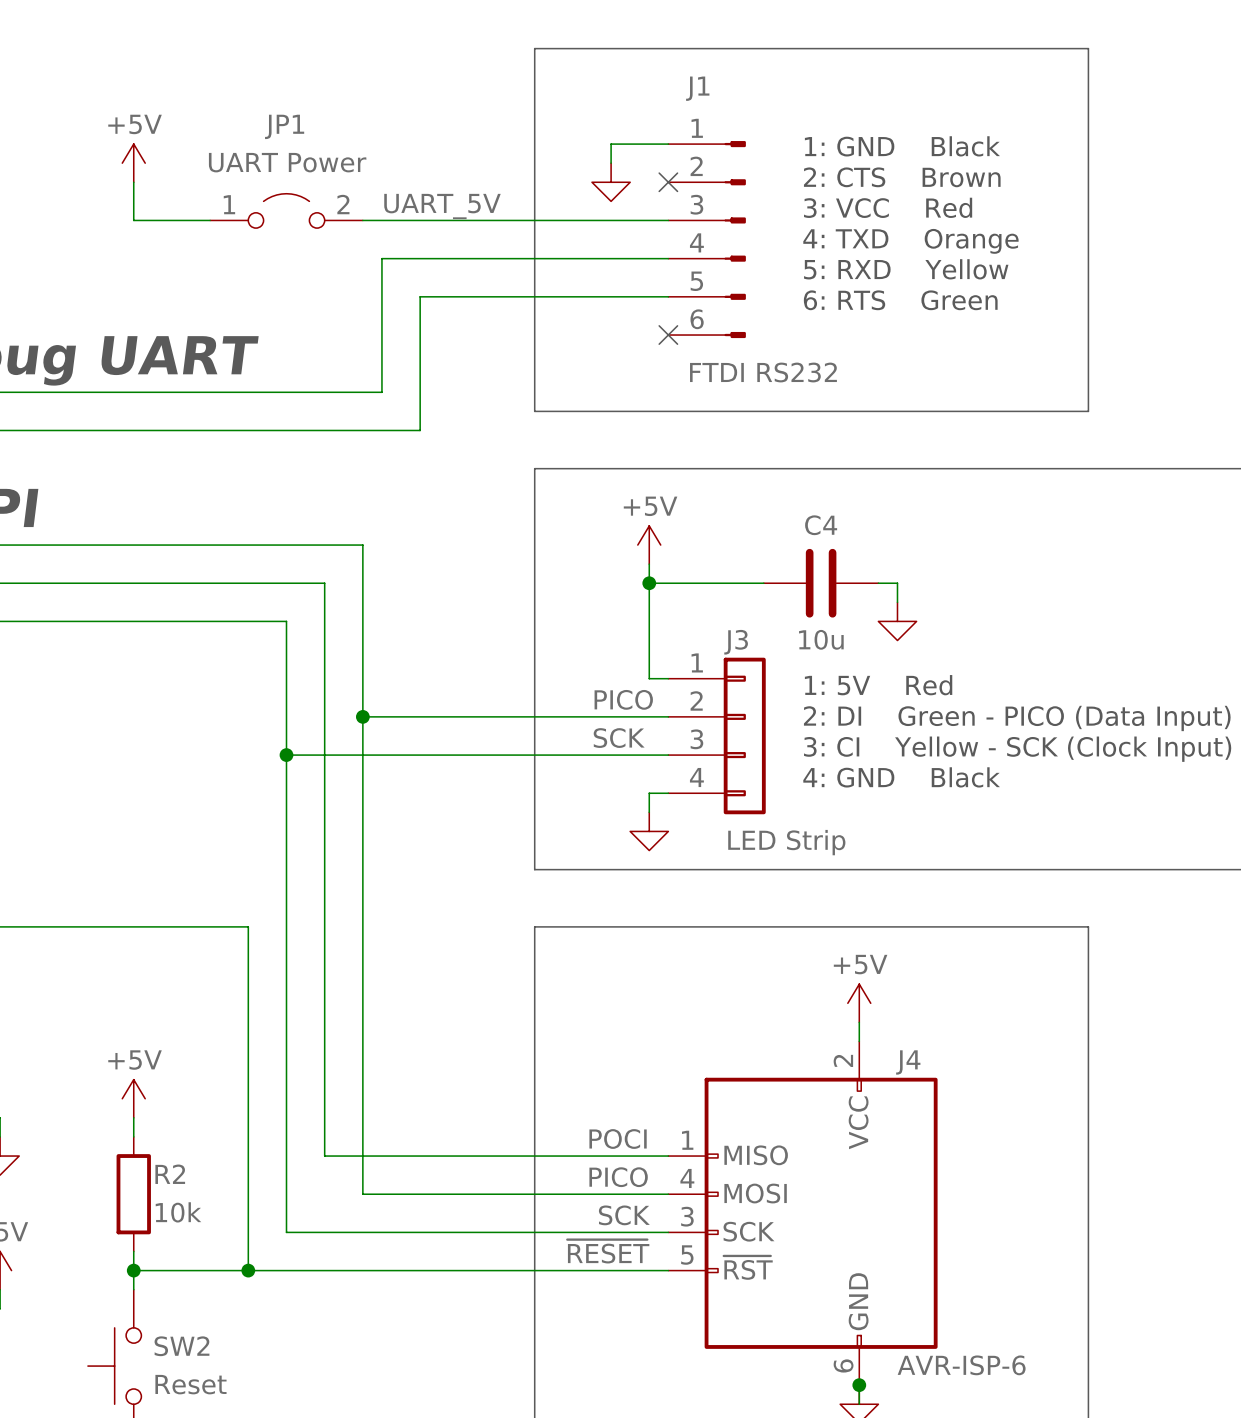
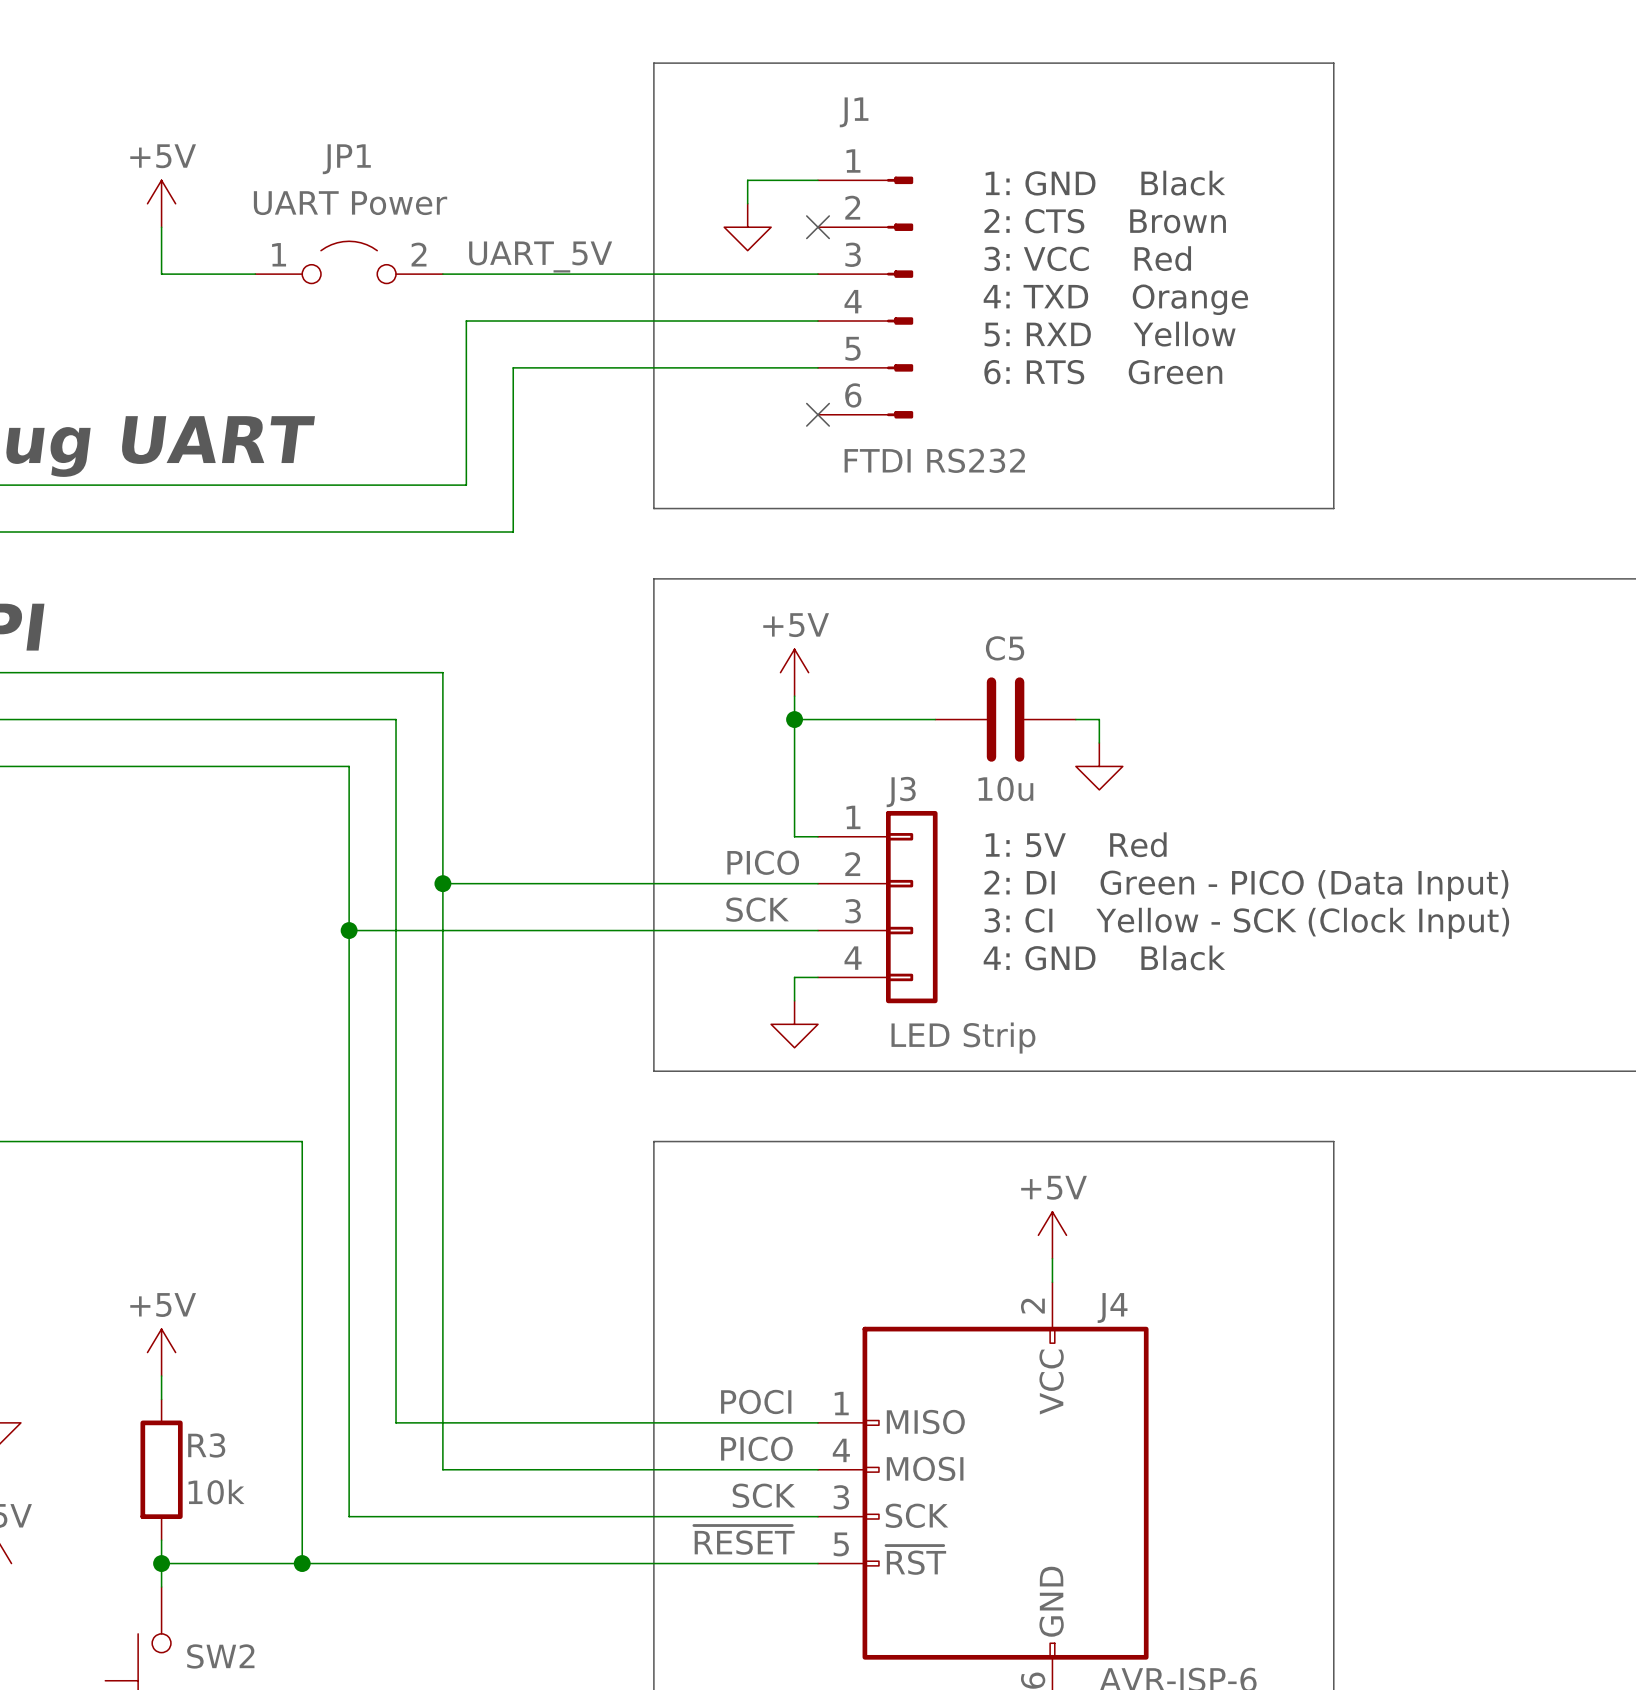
C4 name: C4 (821, 525) -> C5 (1005, 648)
R2 name: R2 (170, 1174) -> R3 (206, 1445)

